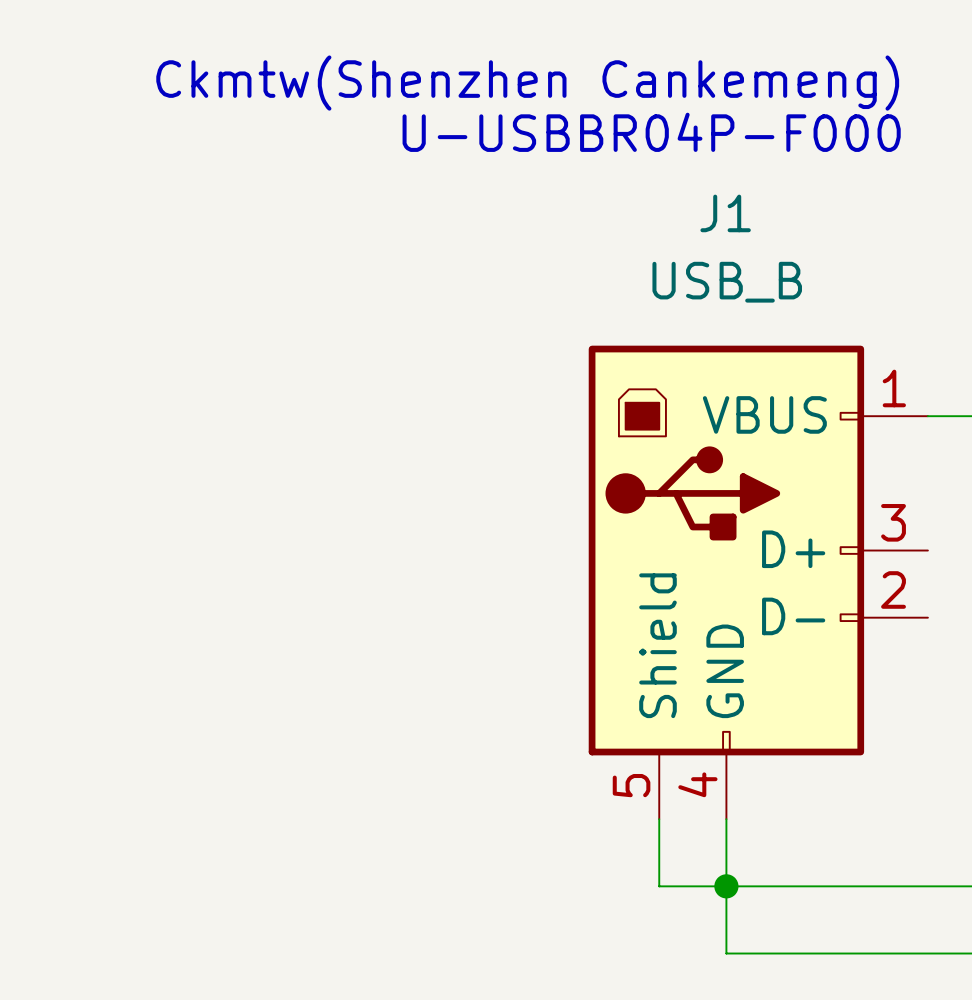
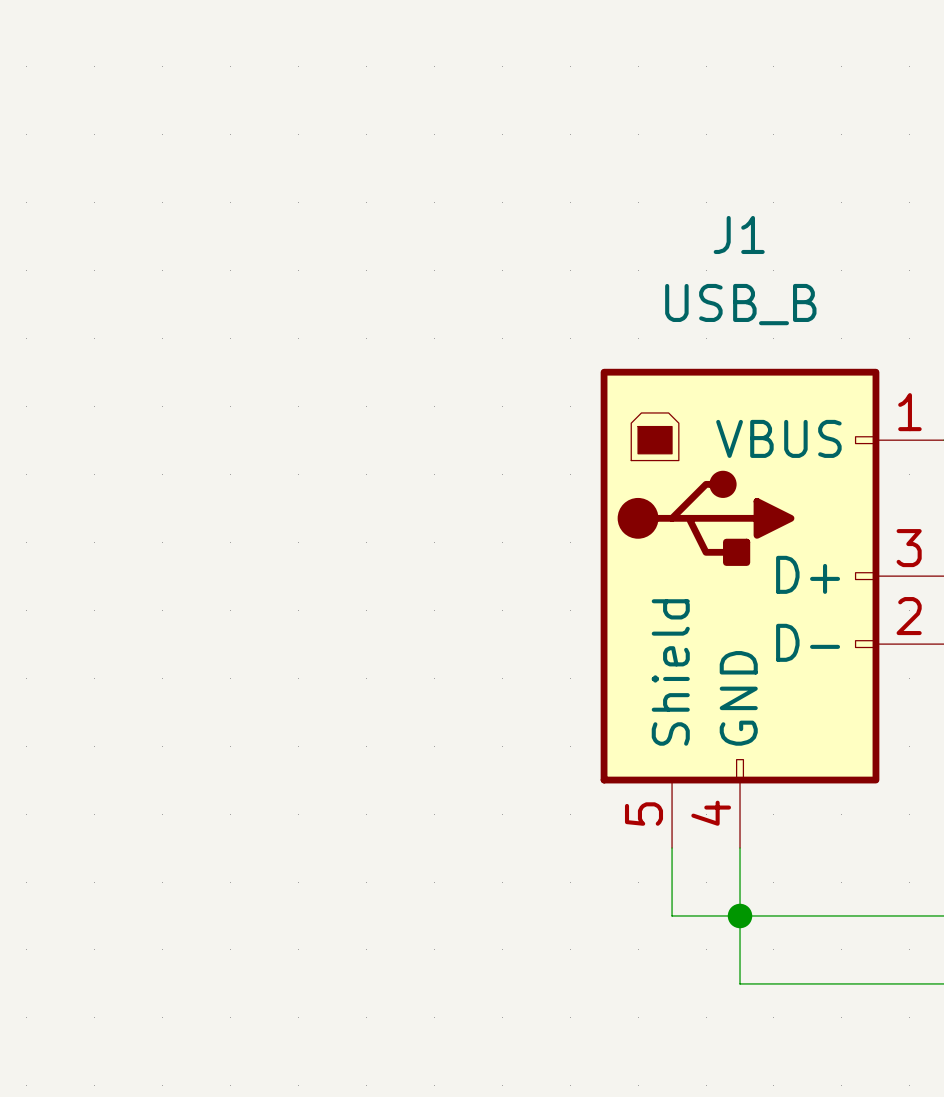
text: Ckmtw(Shenzhen Cankemeng) (527, 83) -> none
text: U-USBBR04P-F000 (651, 132) -> none

